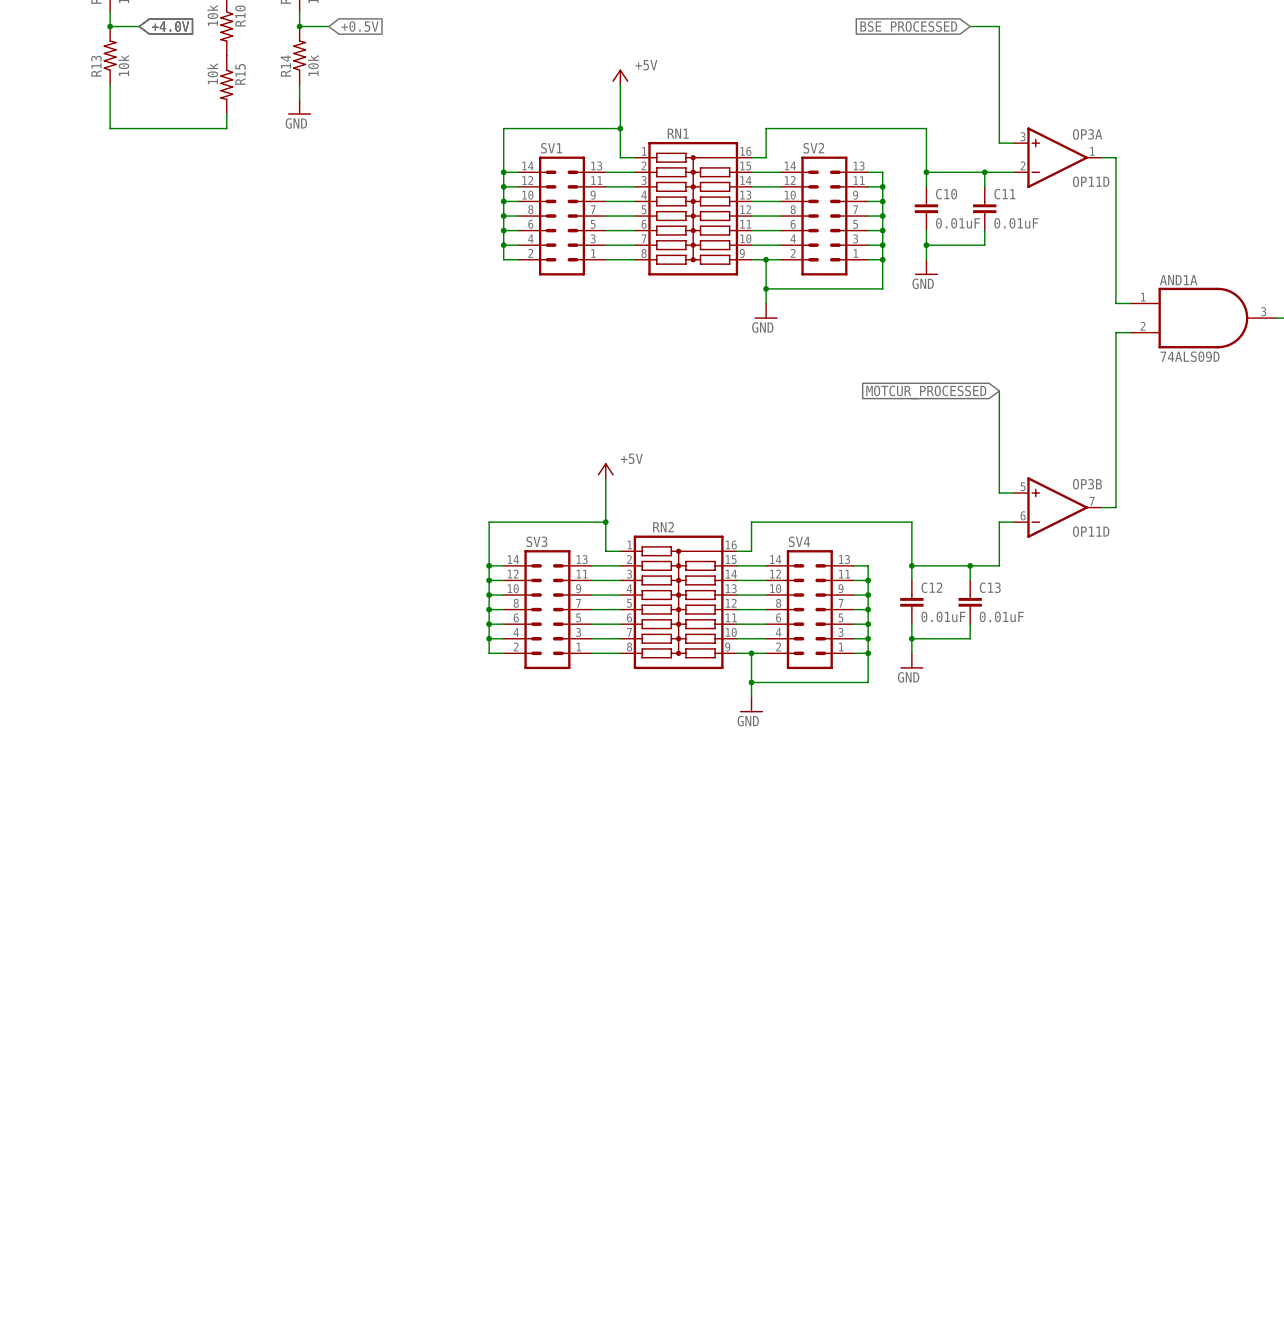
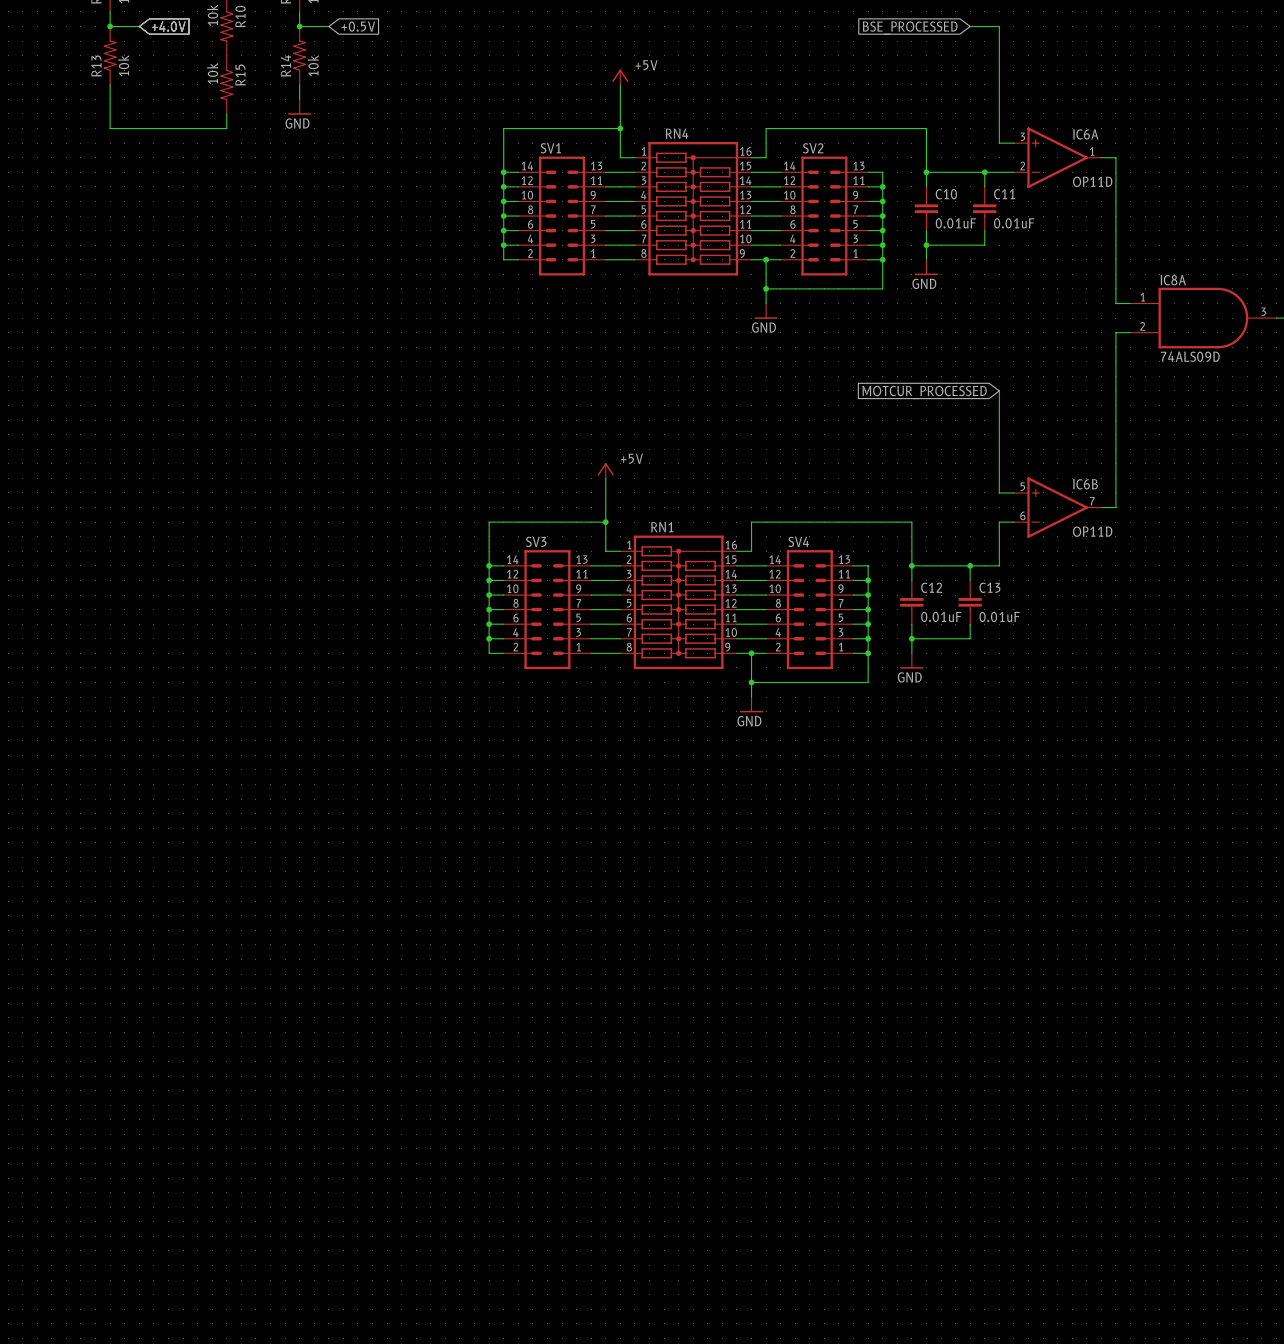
RN1 name: RN1 (678, 133) -> RN4 (677, 133)
OP3A name: OP3A (1087, 134) -> IC6A (1085, 134)
AND1A name: AND1A (1178, 280) -> IC8A (1173, 280)
OP3B name: OP3B (1087, 484) -> IC6B (1085, 484)
RN2 name: RN2 (663, 527) -> RN1 (662, 527)

